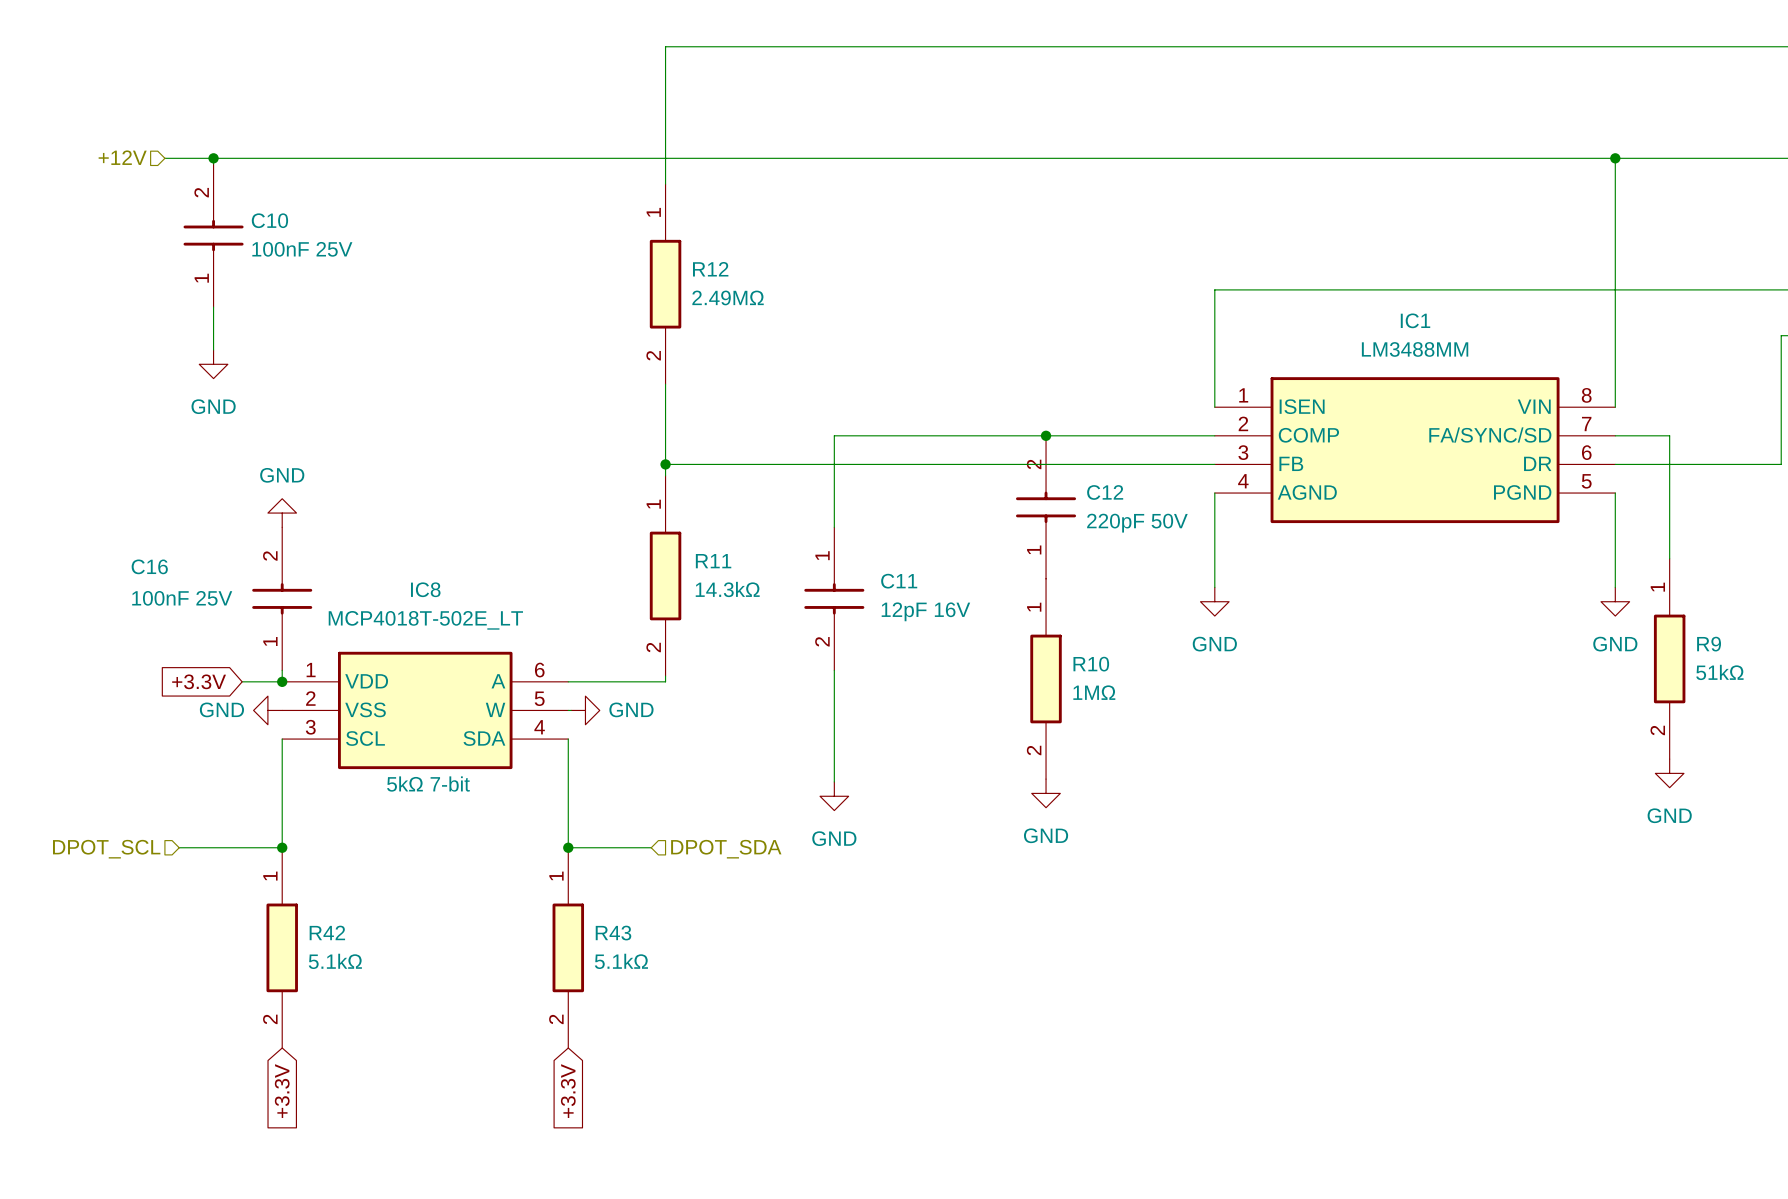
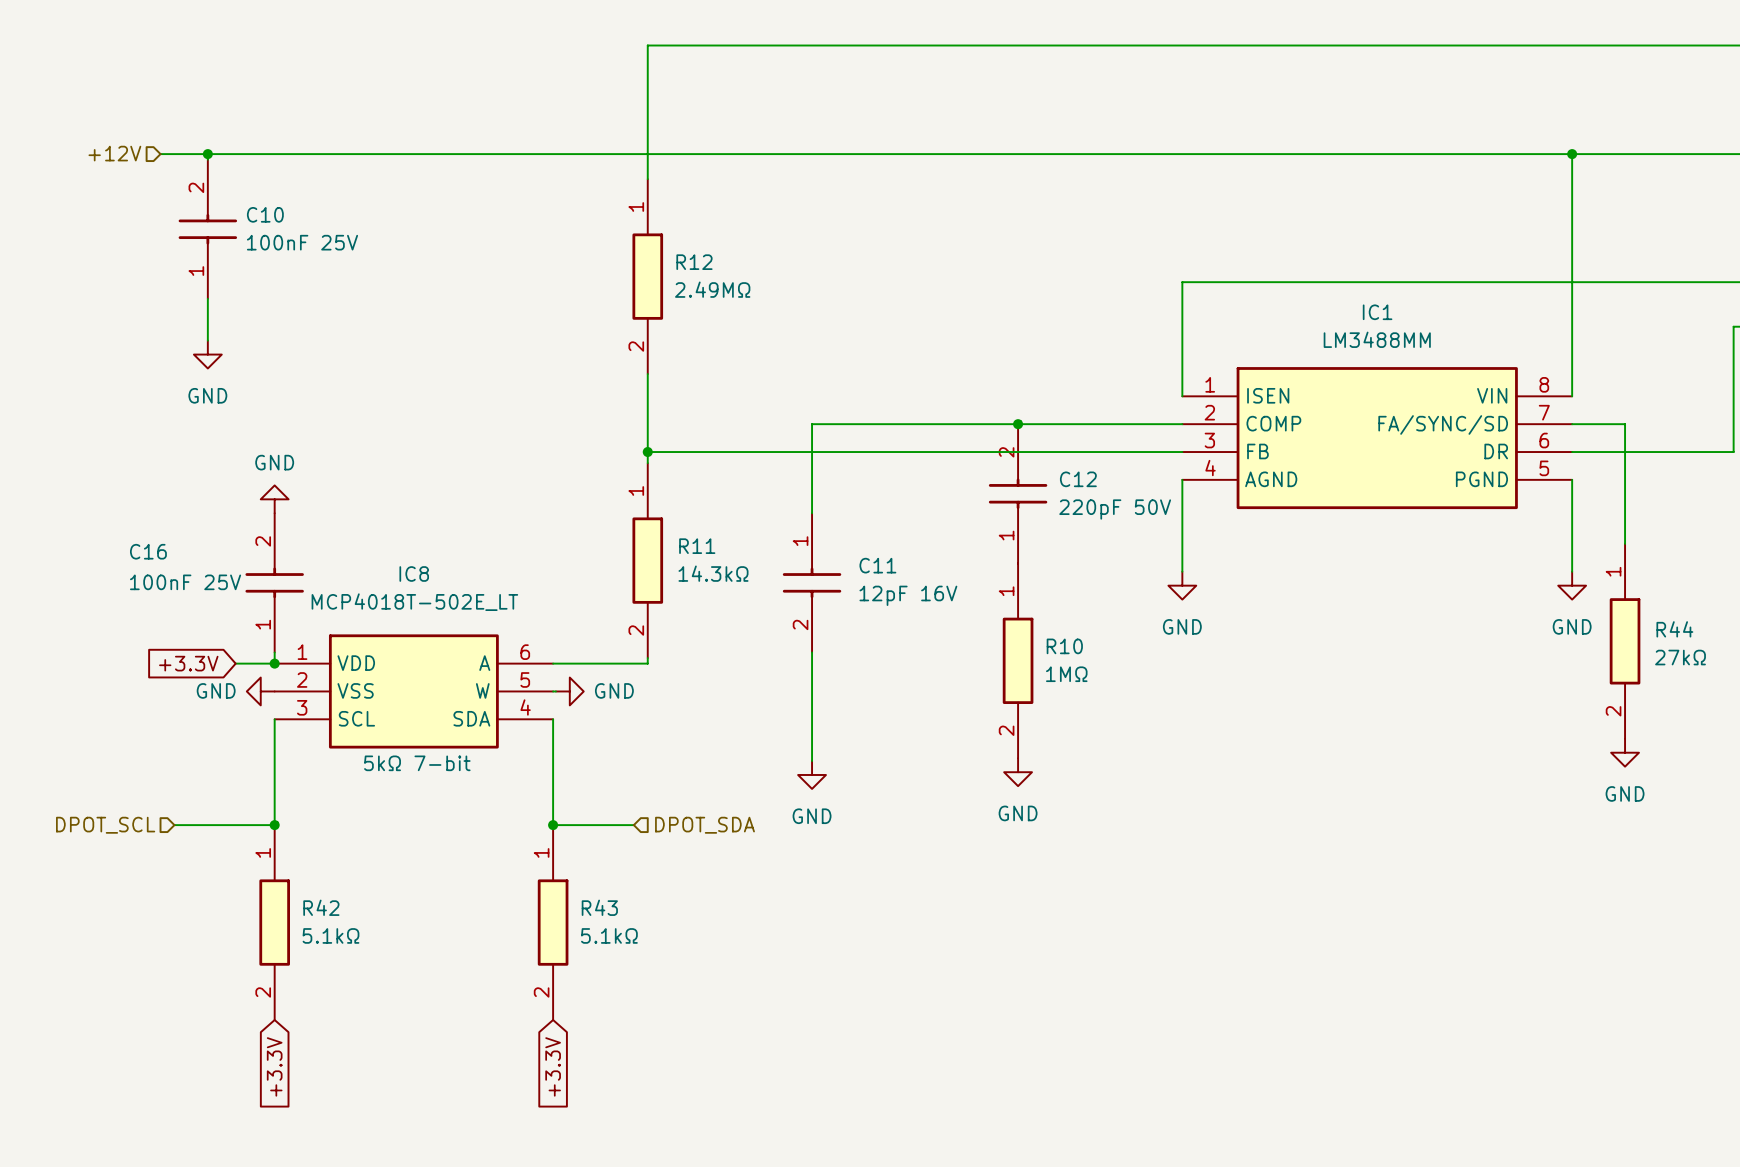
R9 name: R9 (1709, 644) -> R44 (1674, 629)
R9 value: 51kΩ (1719, 672) -> 27kΩ (1680, 657)

